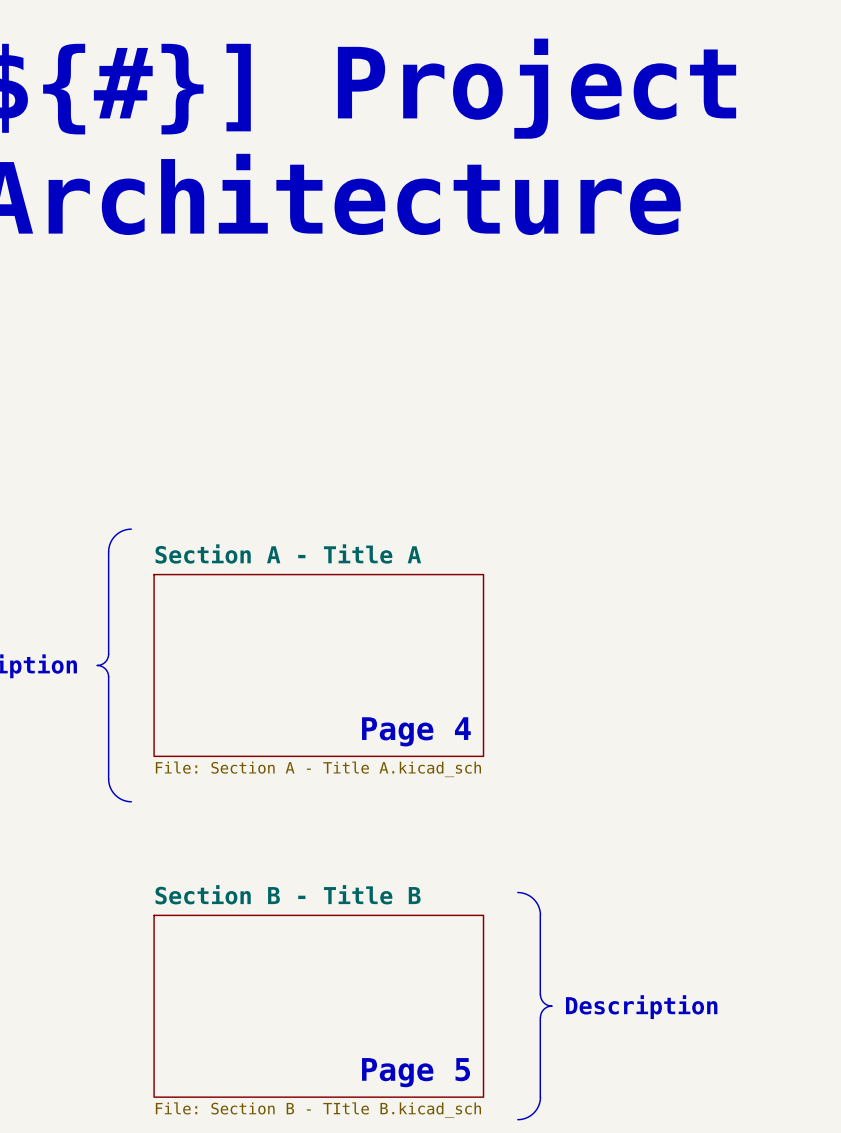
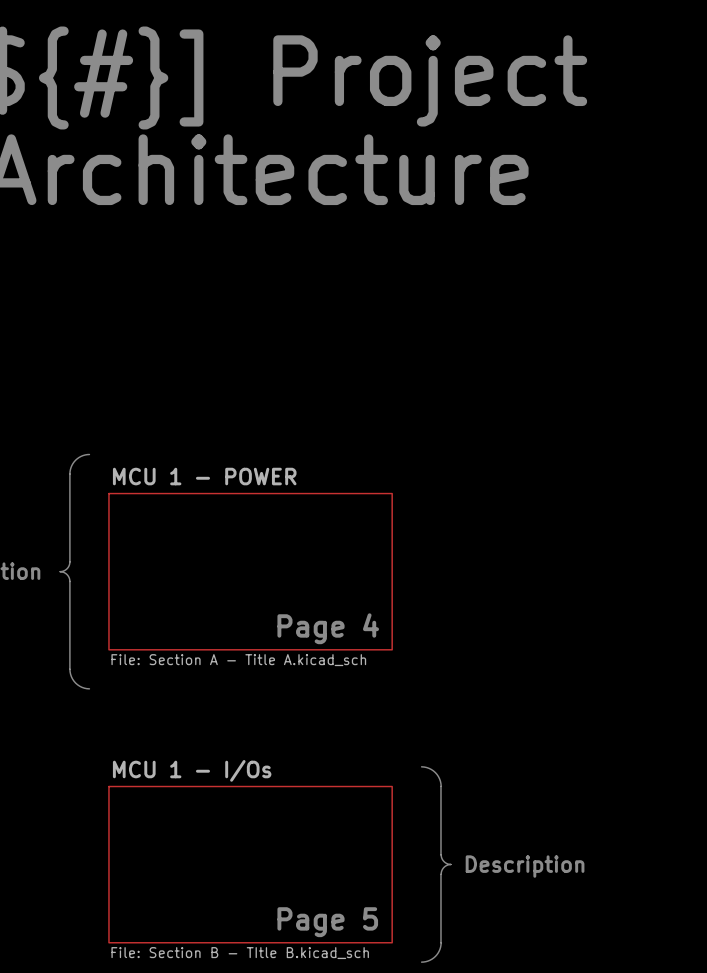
sheet Section A - Title A name: Section A - Title A (288, 553) -> MCU 1 - POWER (204, 476)
sheet Section B - Title B name: Section B - Title B (288, 894) -> MCU 1 - I/Os (192, 770)

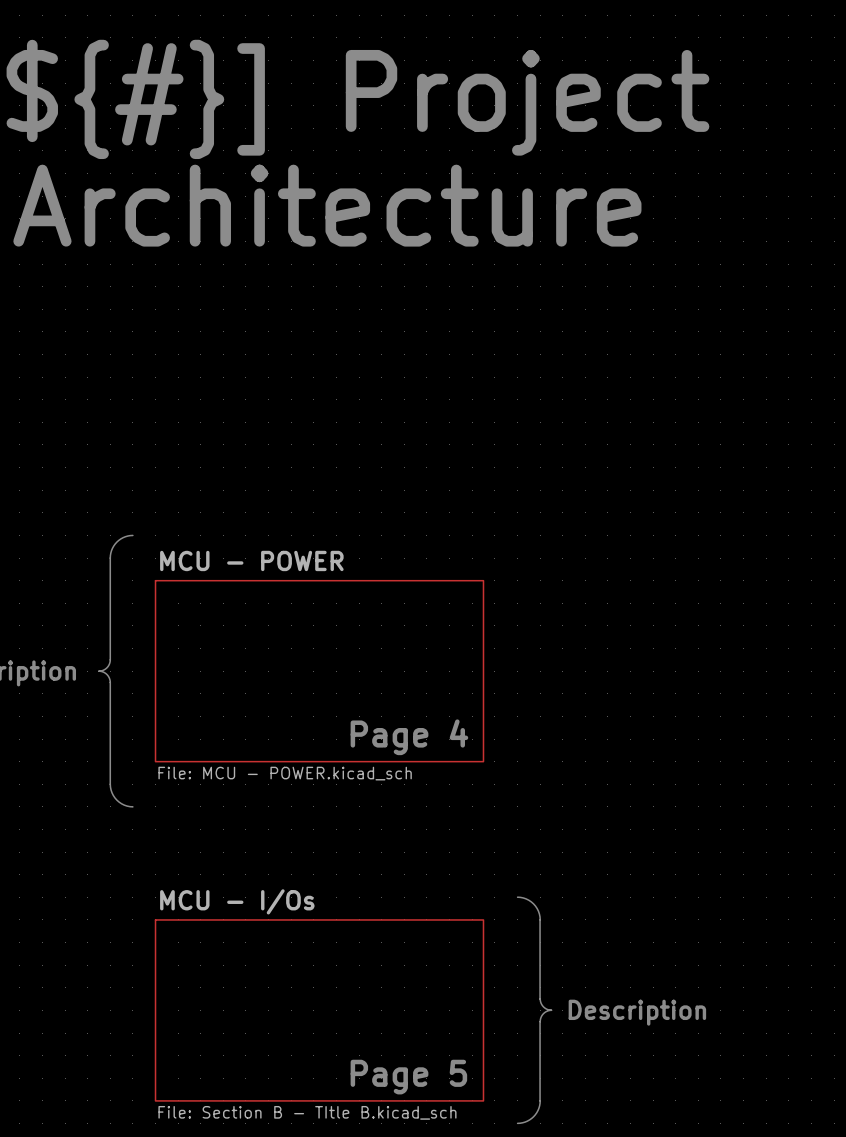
sheet MCU 1 - POWER name: MCU 1 - POWER (204, 476) -> MCU - POWER (251, 560)
sheet MCU 1 - POWER value: File: Section A - Title A.kicad_sch (238, 660) -> File: MCU - POWER.kicad_sch (285, 773)
sheet MCU 1 - I/Os name: MCU 1 - I/Os (192, 770) -> MCU - I/Os (237, 901)

